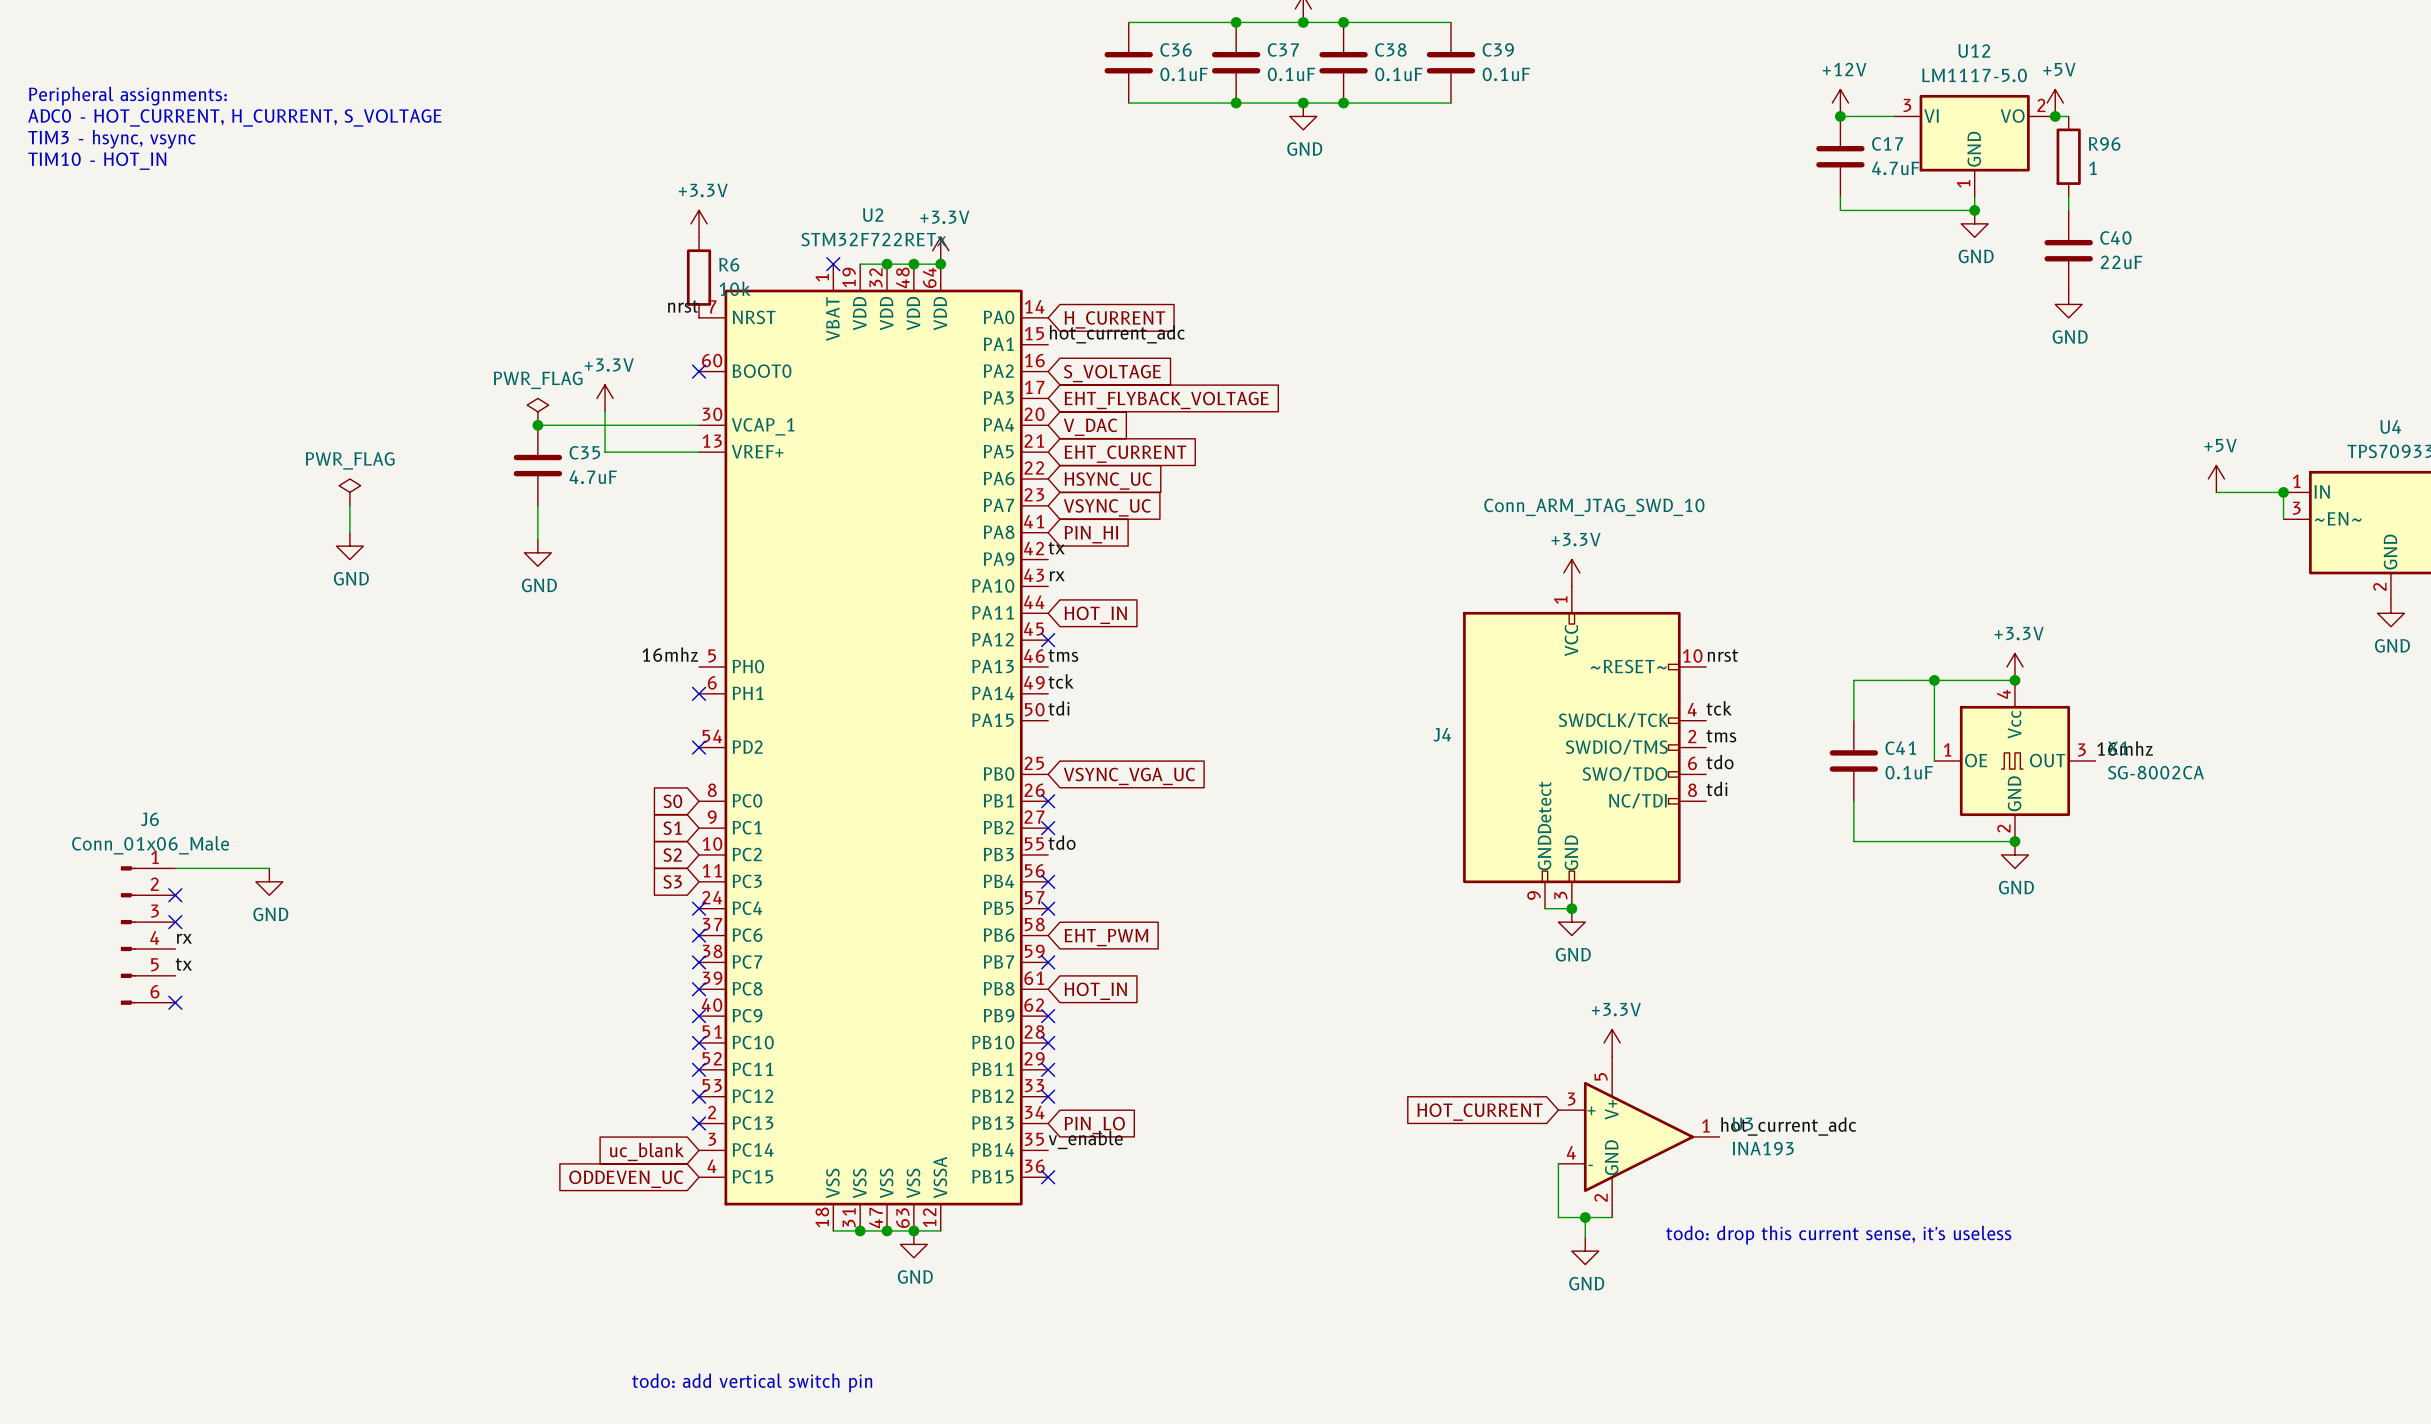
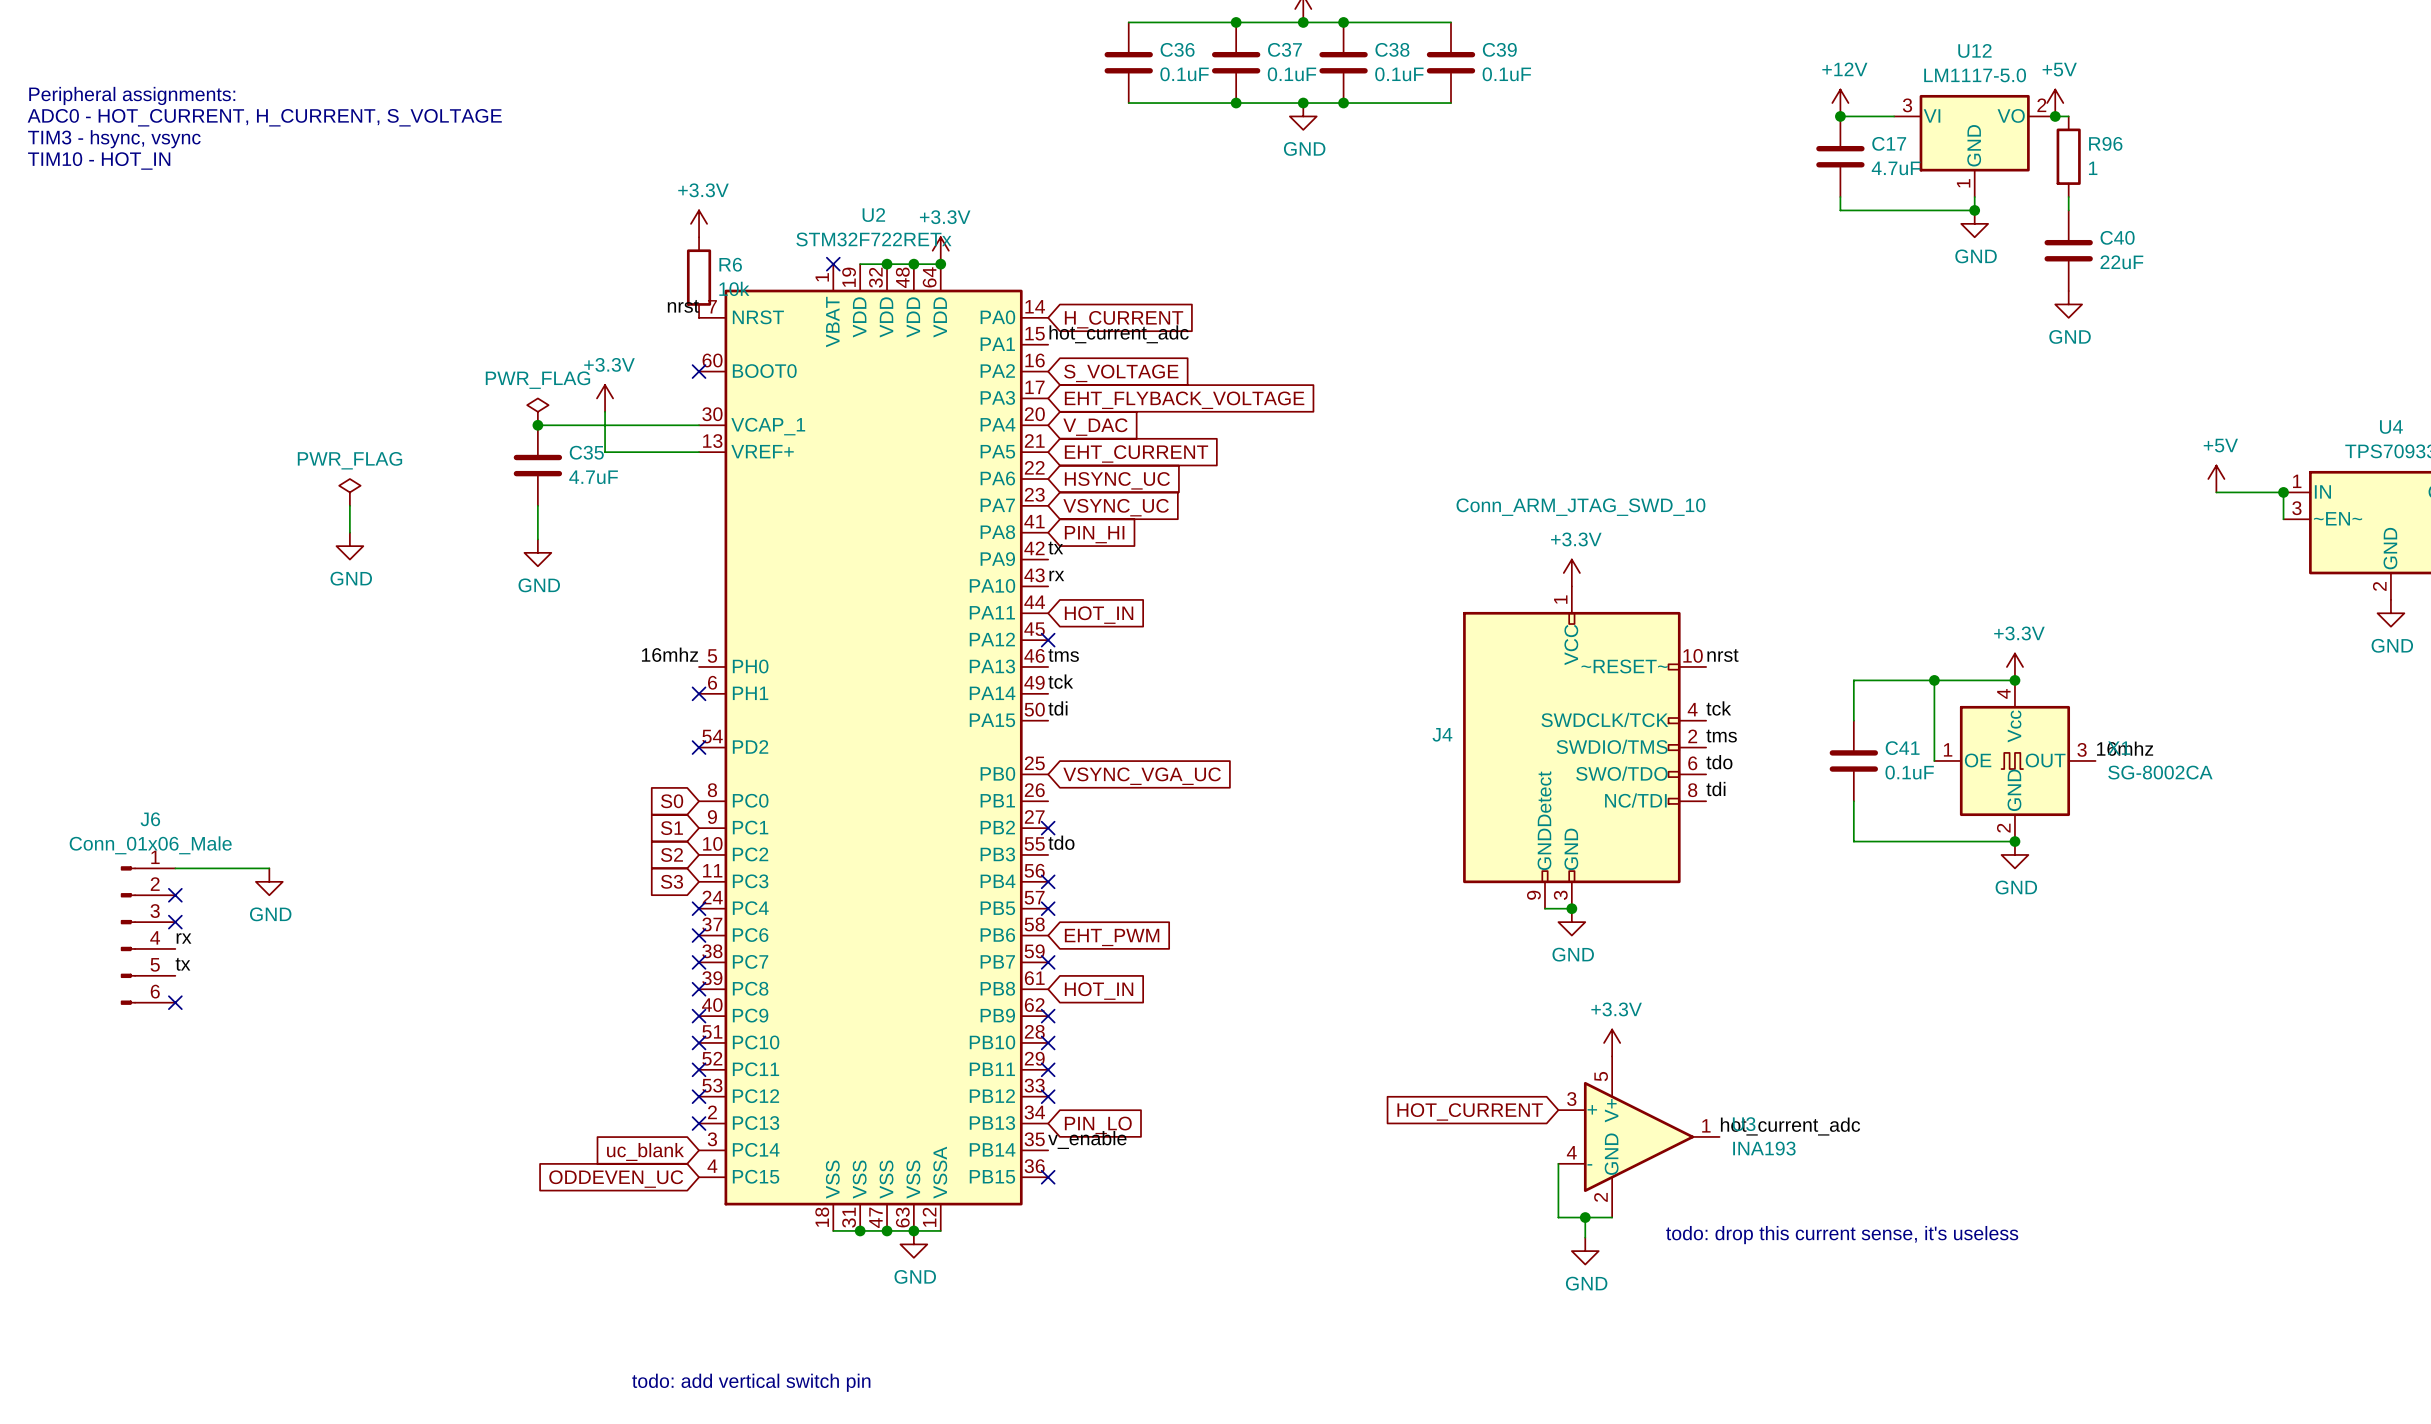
no-connect mark: (1048, 801) -> none

